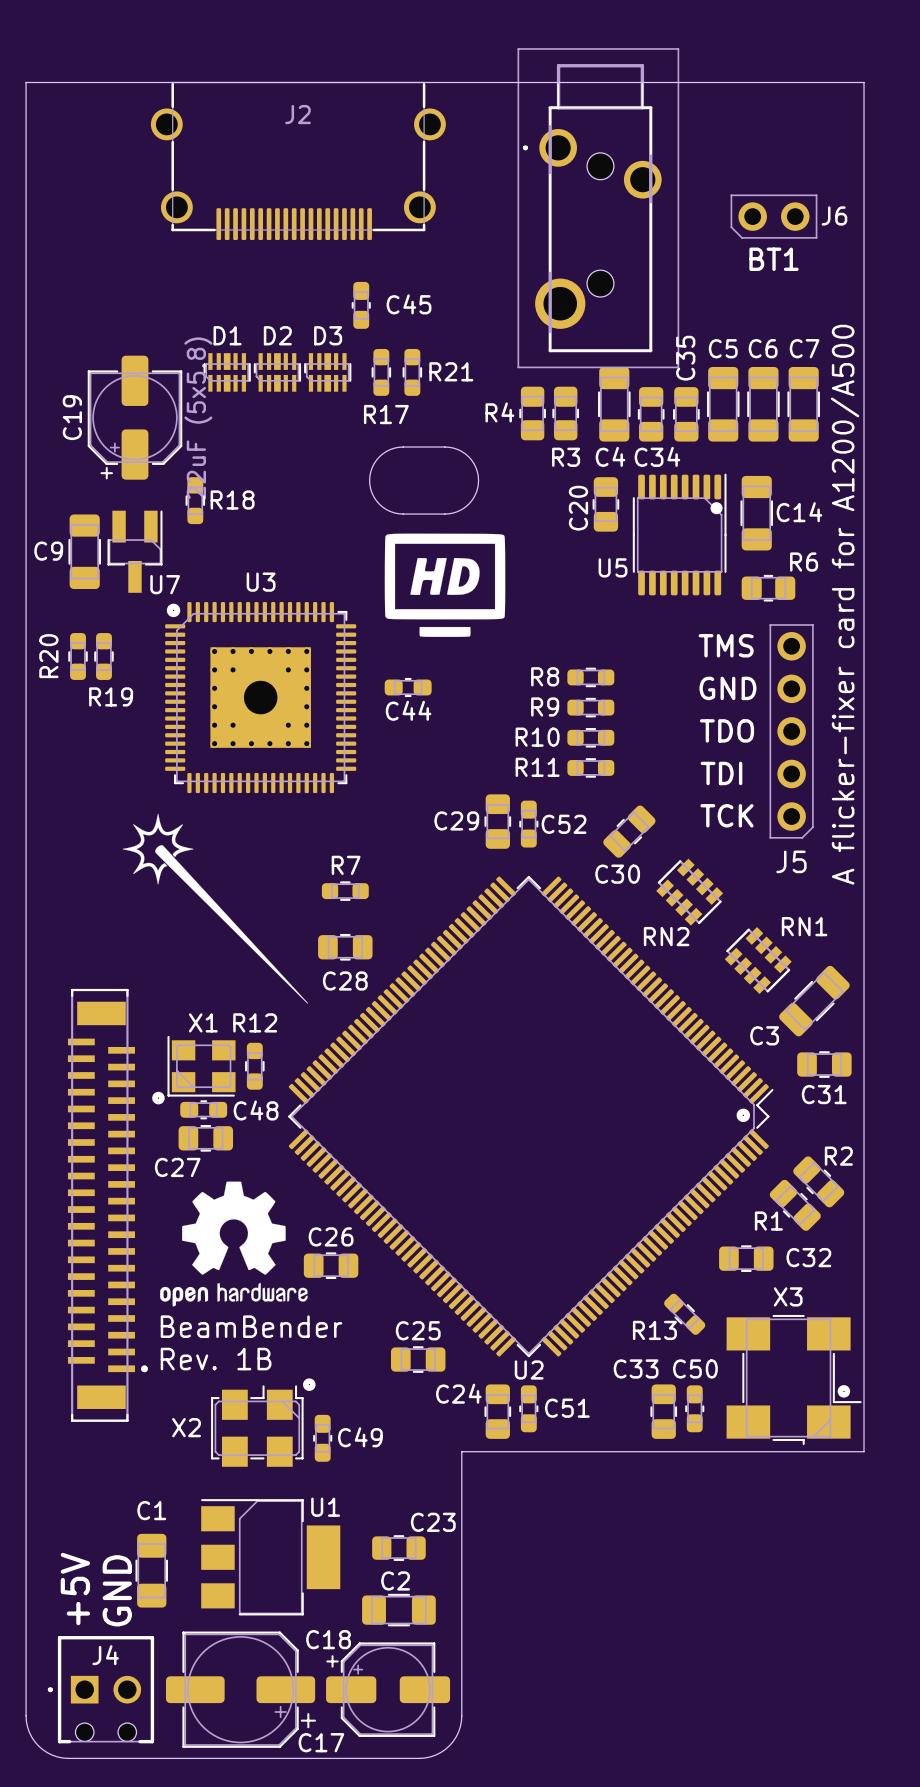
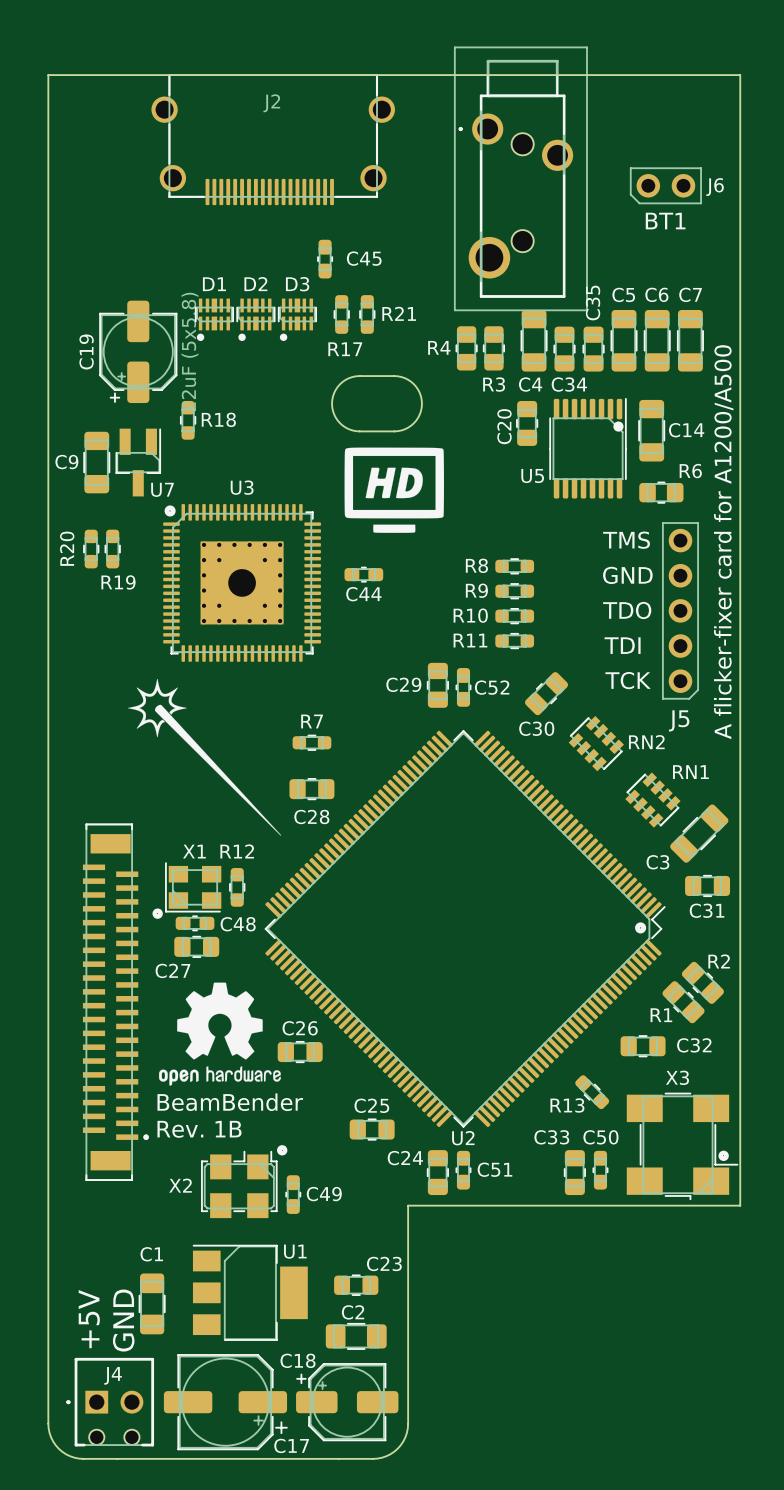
D1 footprint: [203, 353, 251, 392] -> [194, 298, 234, 341]
D2 footprint: [253, 353, 302, 392] -> [236, 298, 276, 341]
D3 footprint: [304, 353, 352, 392] -> [277, 298, 317, 341]
RN2 name position: RN2 (666, 936) -> RN2 (646, 742)

